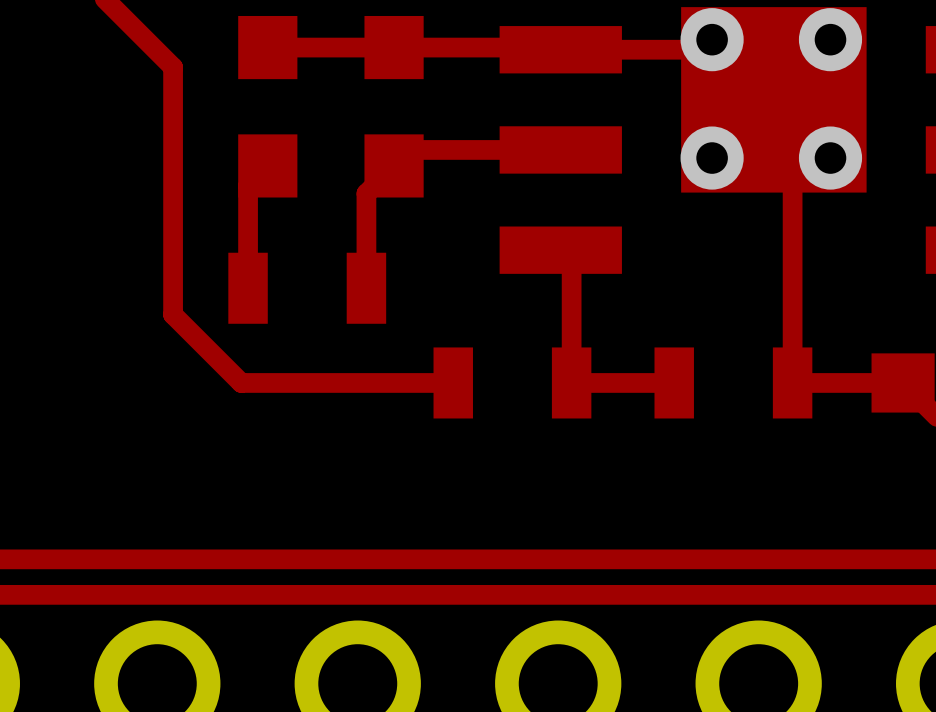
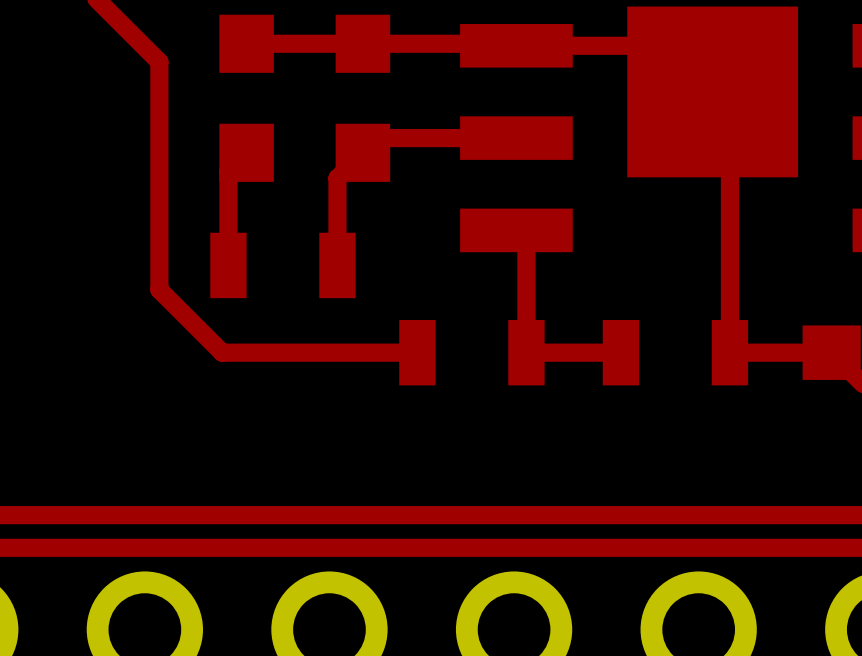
via: (712, 39) -> none
via: (830, 39) -> none
via: (712, 158) -> none
via: (830, 158) -> none

